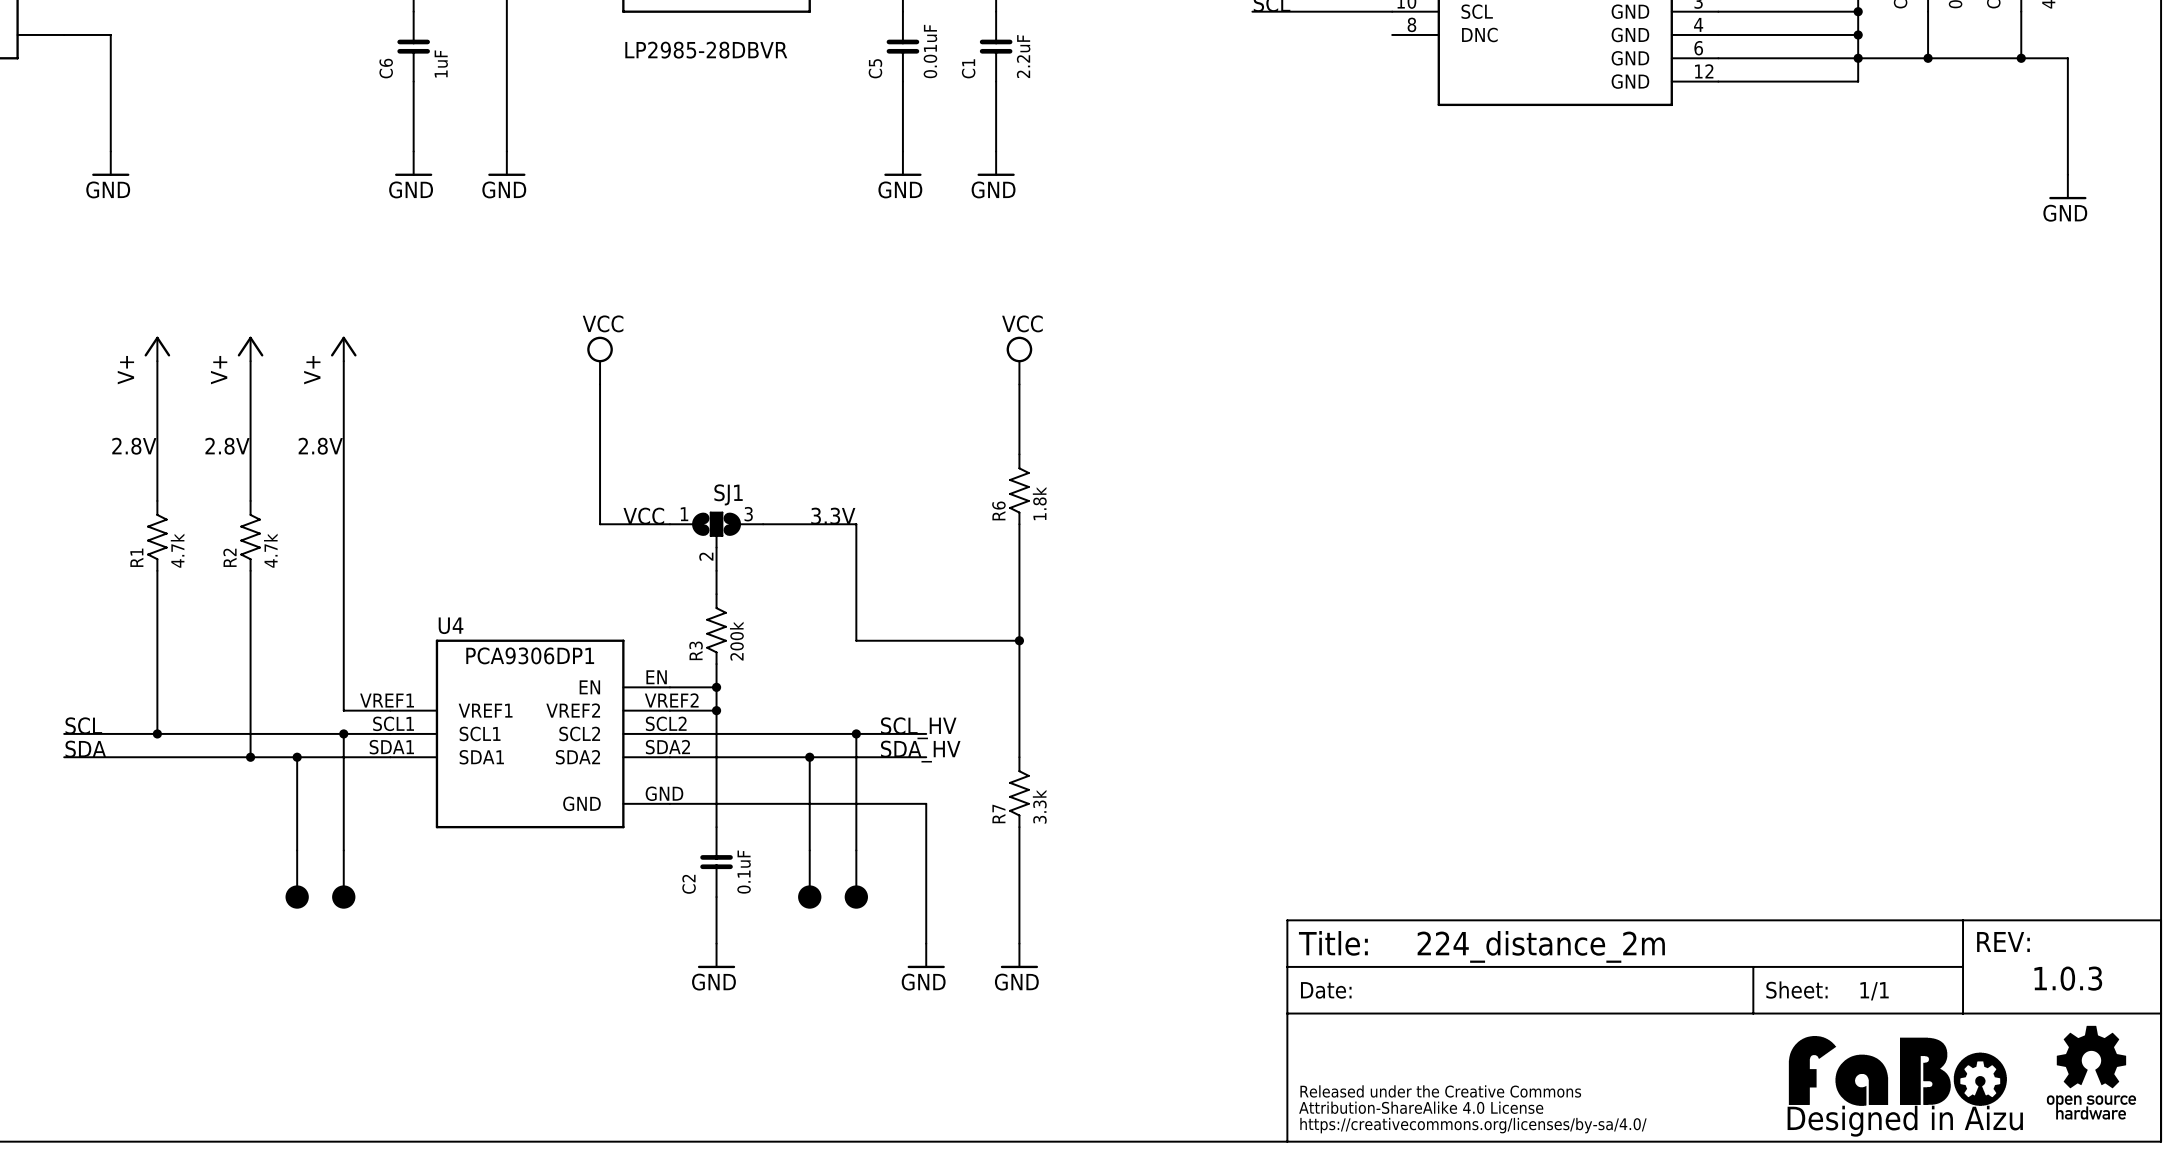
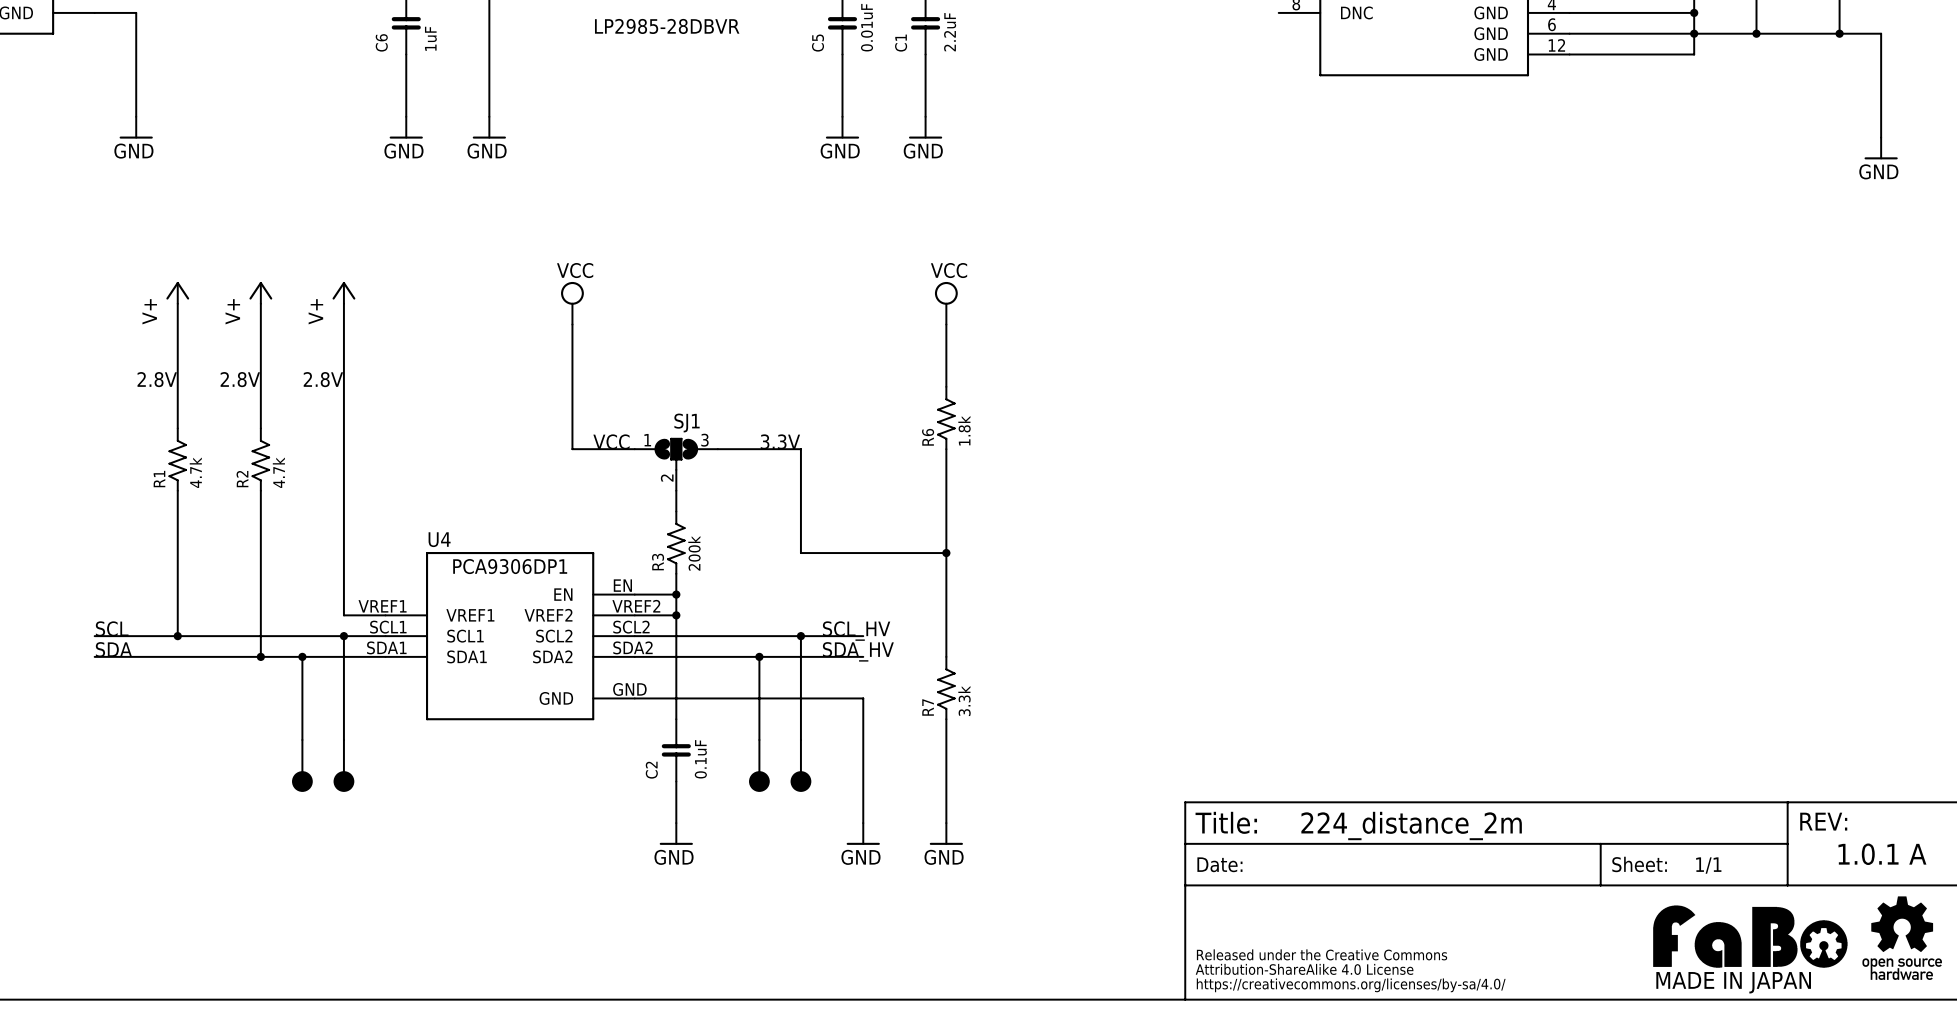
text: 1.0.3 (2068, 978) -> 1.0.1 A (1882, 854)
part: (1897, 1070) -> none
part: none -> (1750, 936)

